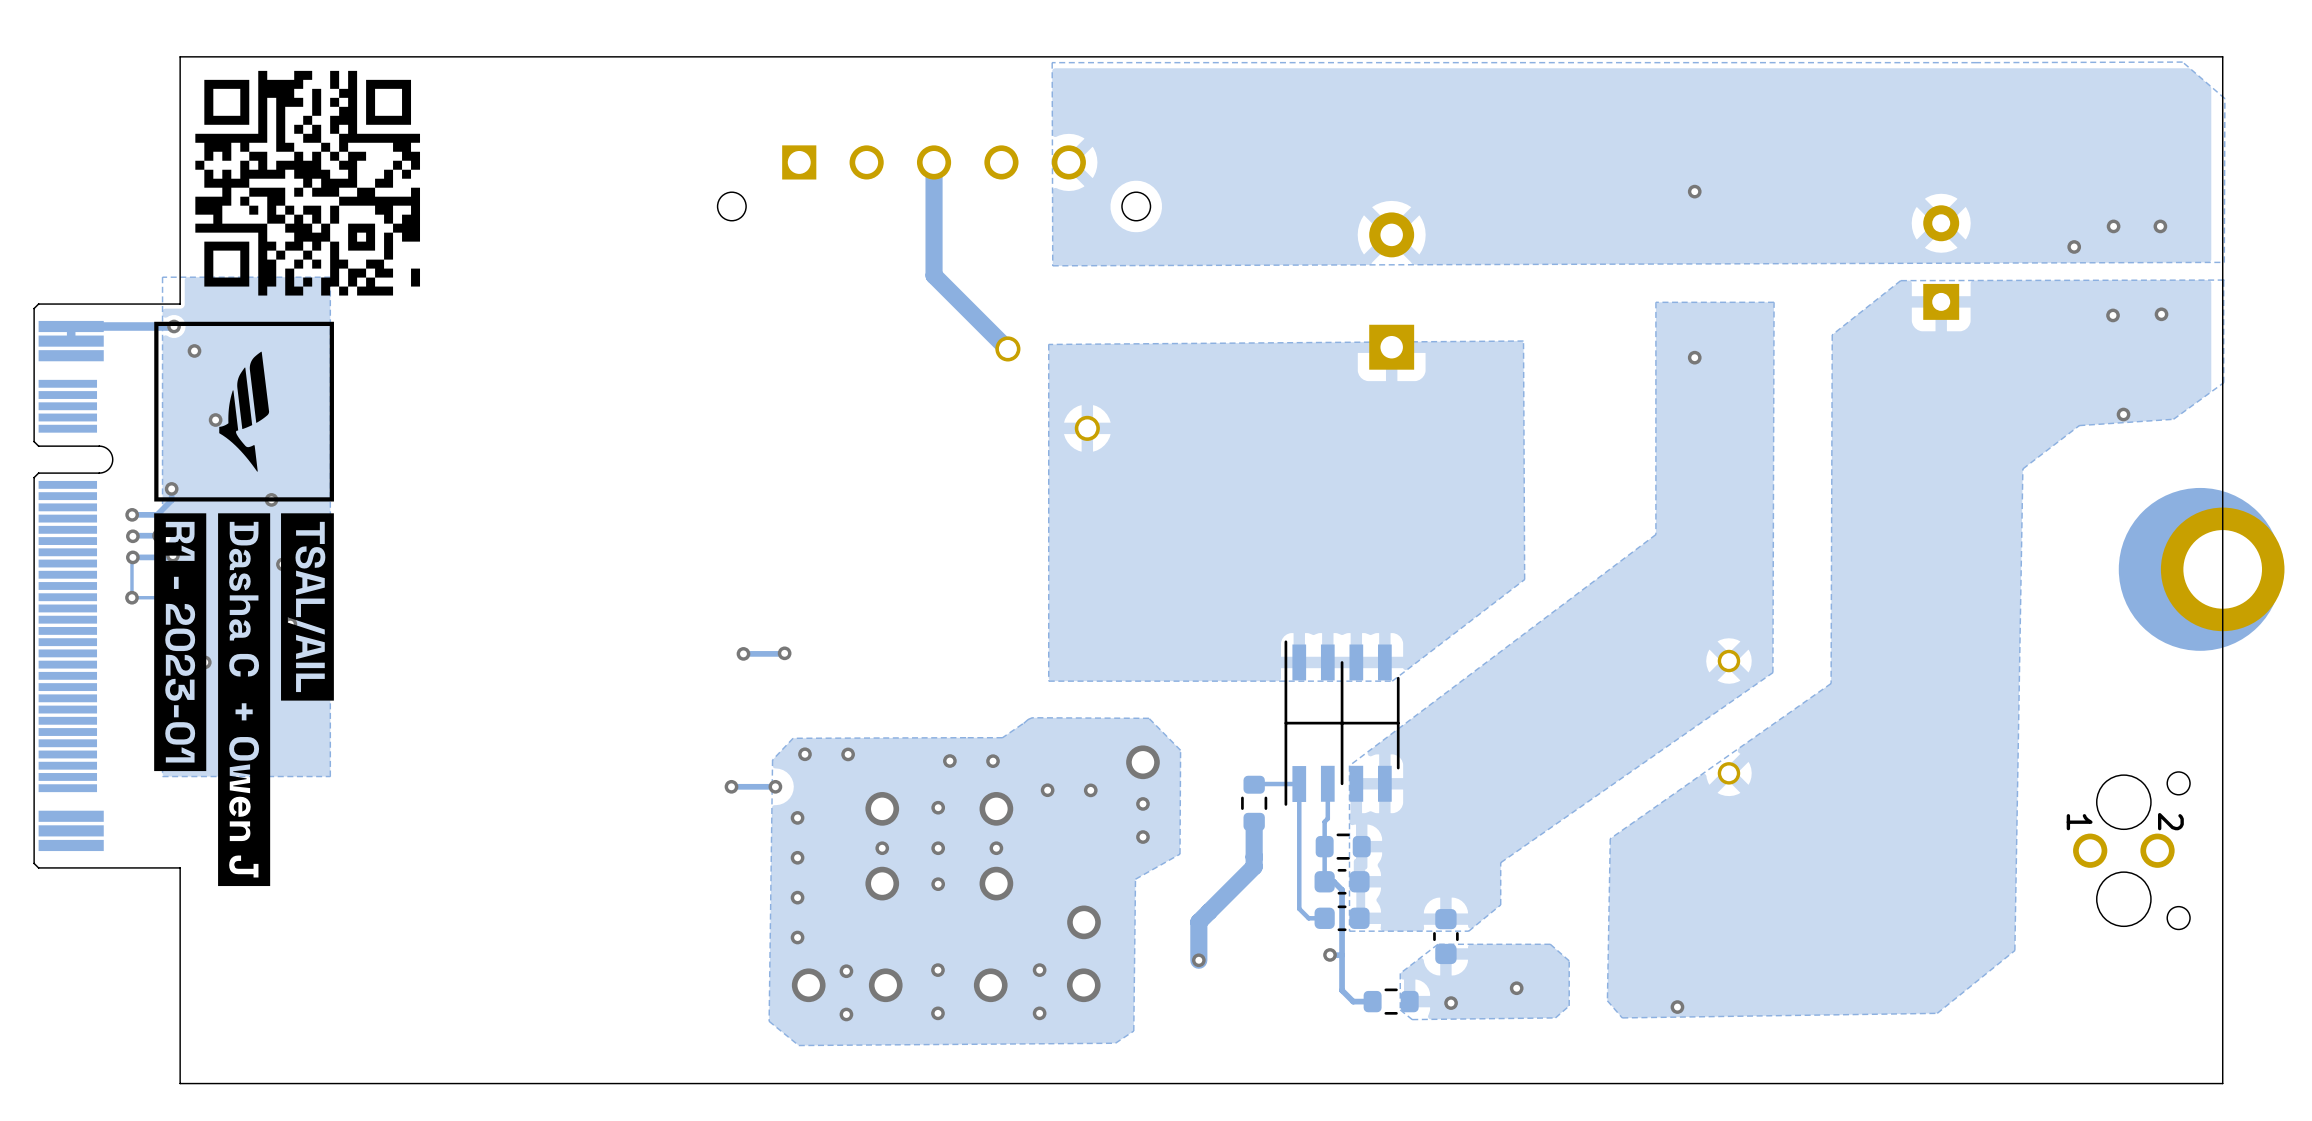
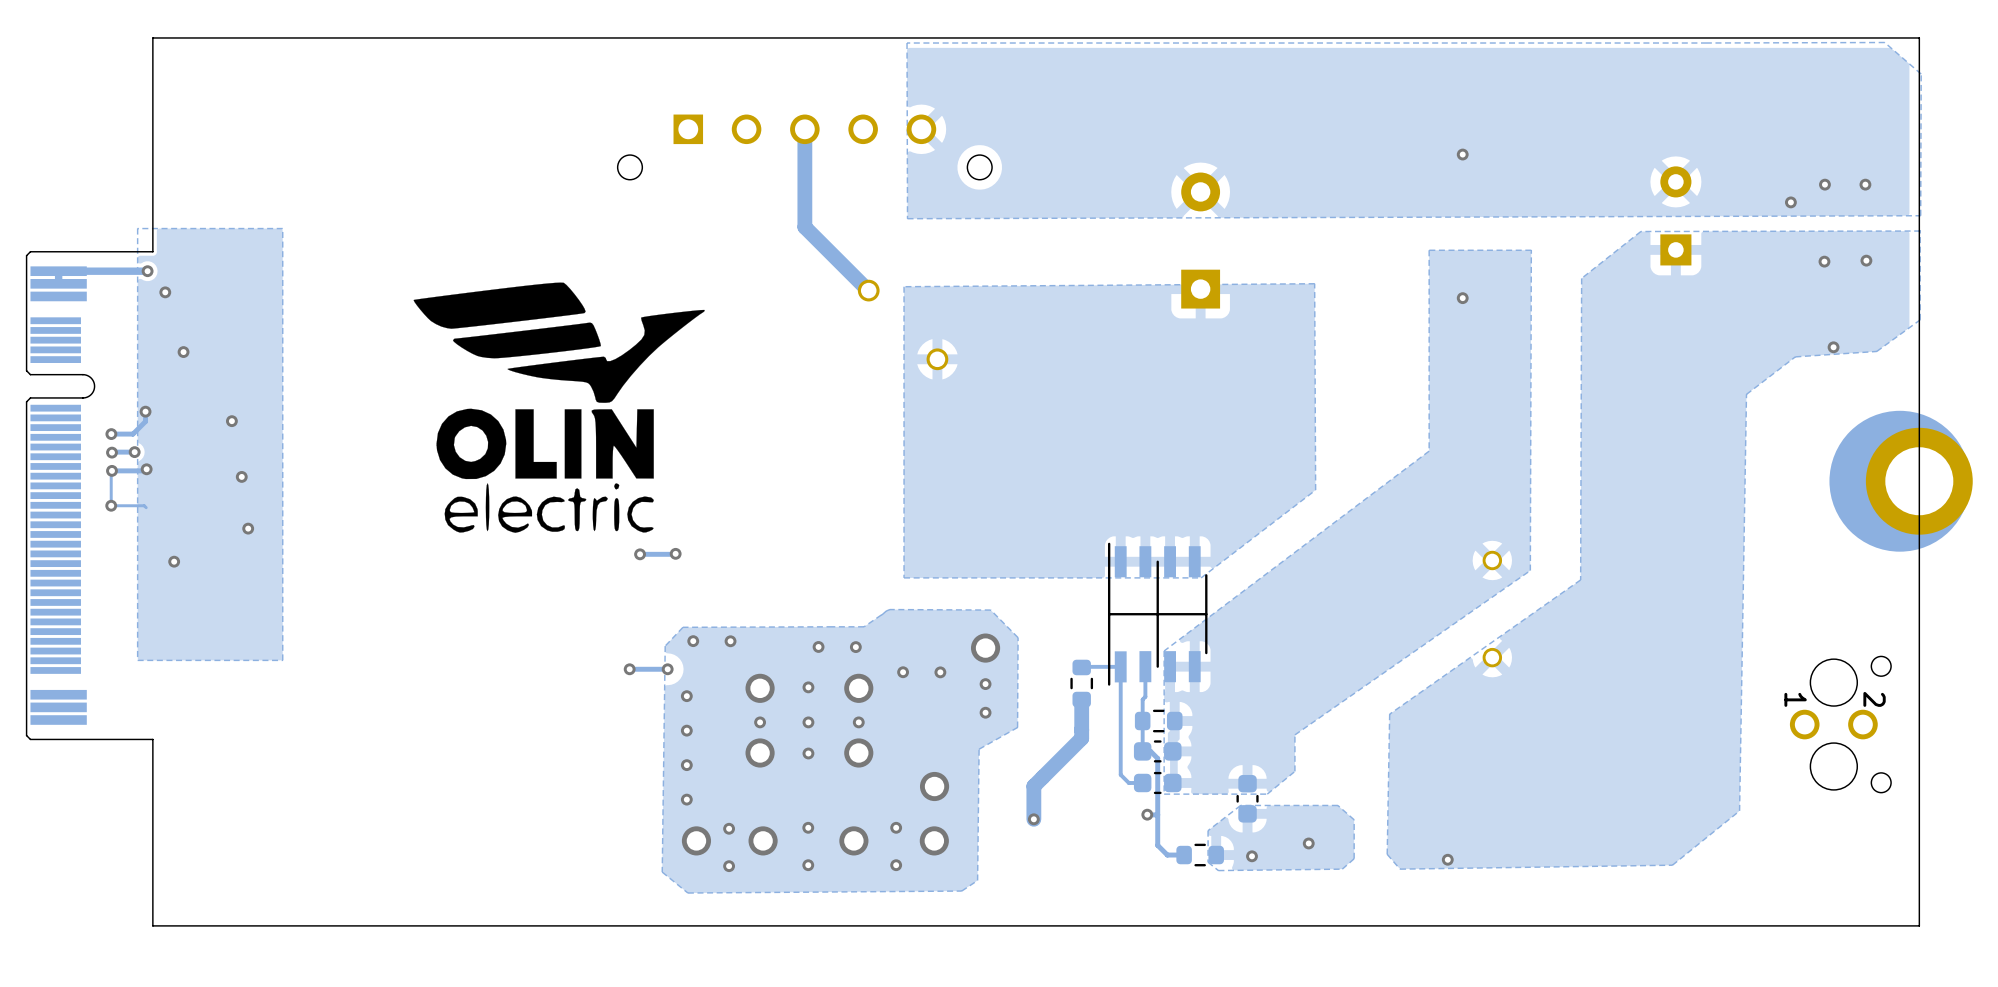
drawing: [154, 70, 421, 887] -> none
drawing: none -> [413, 282, 705, 533]

